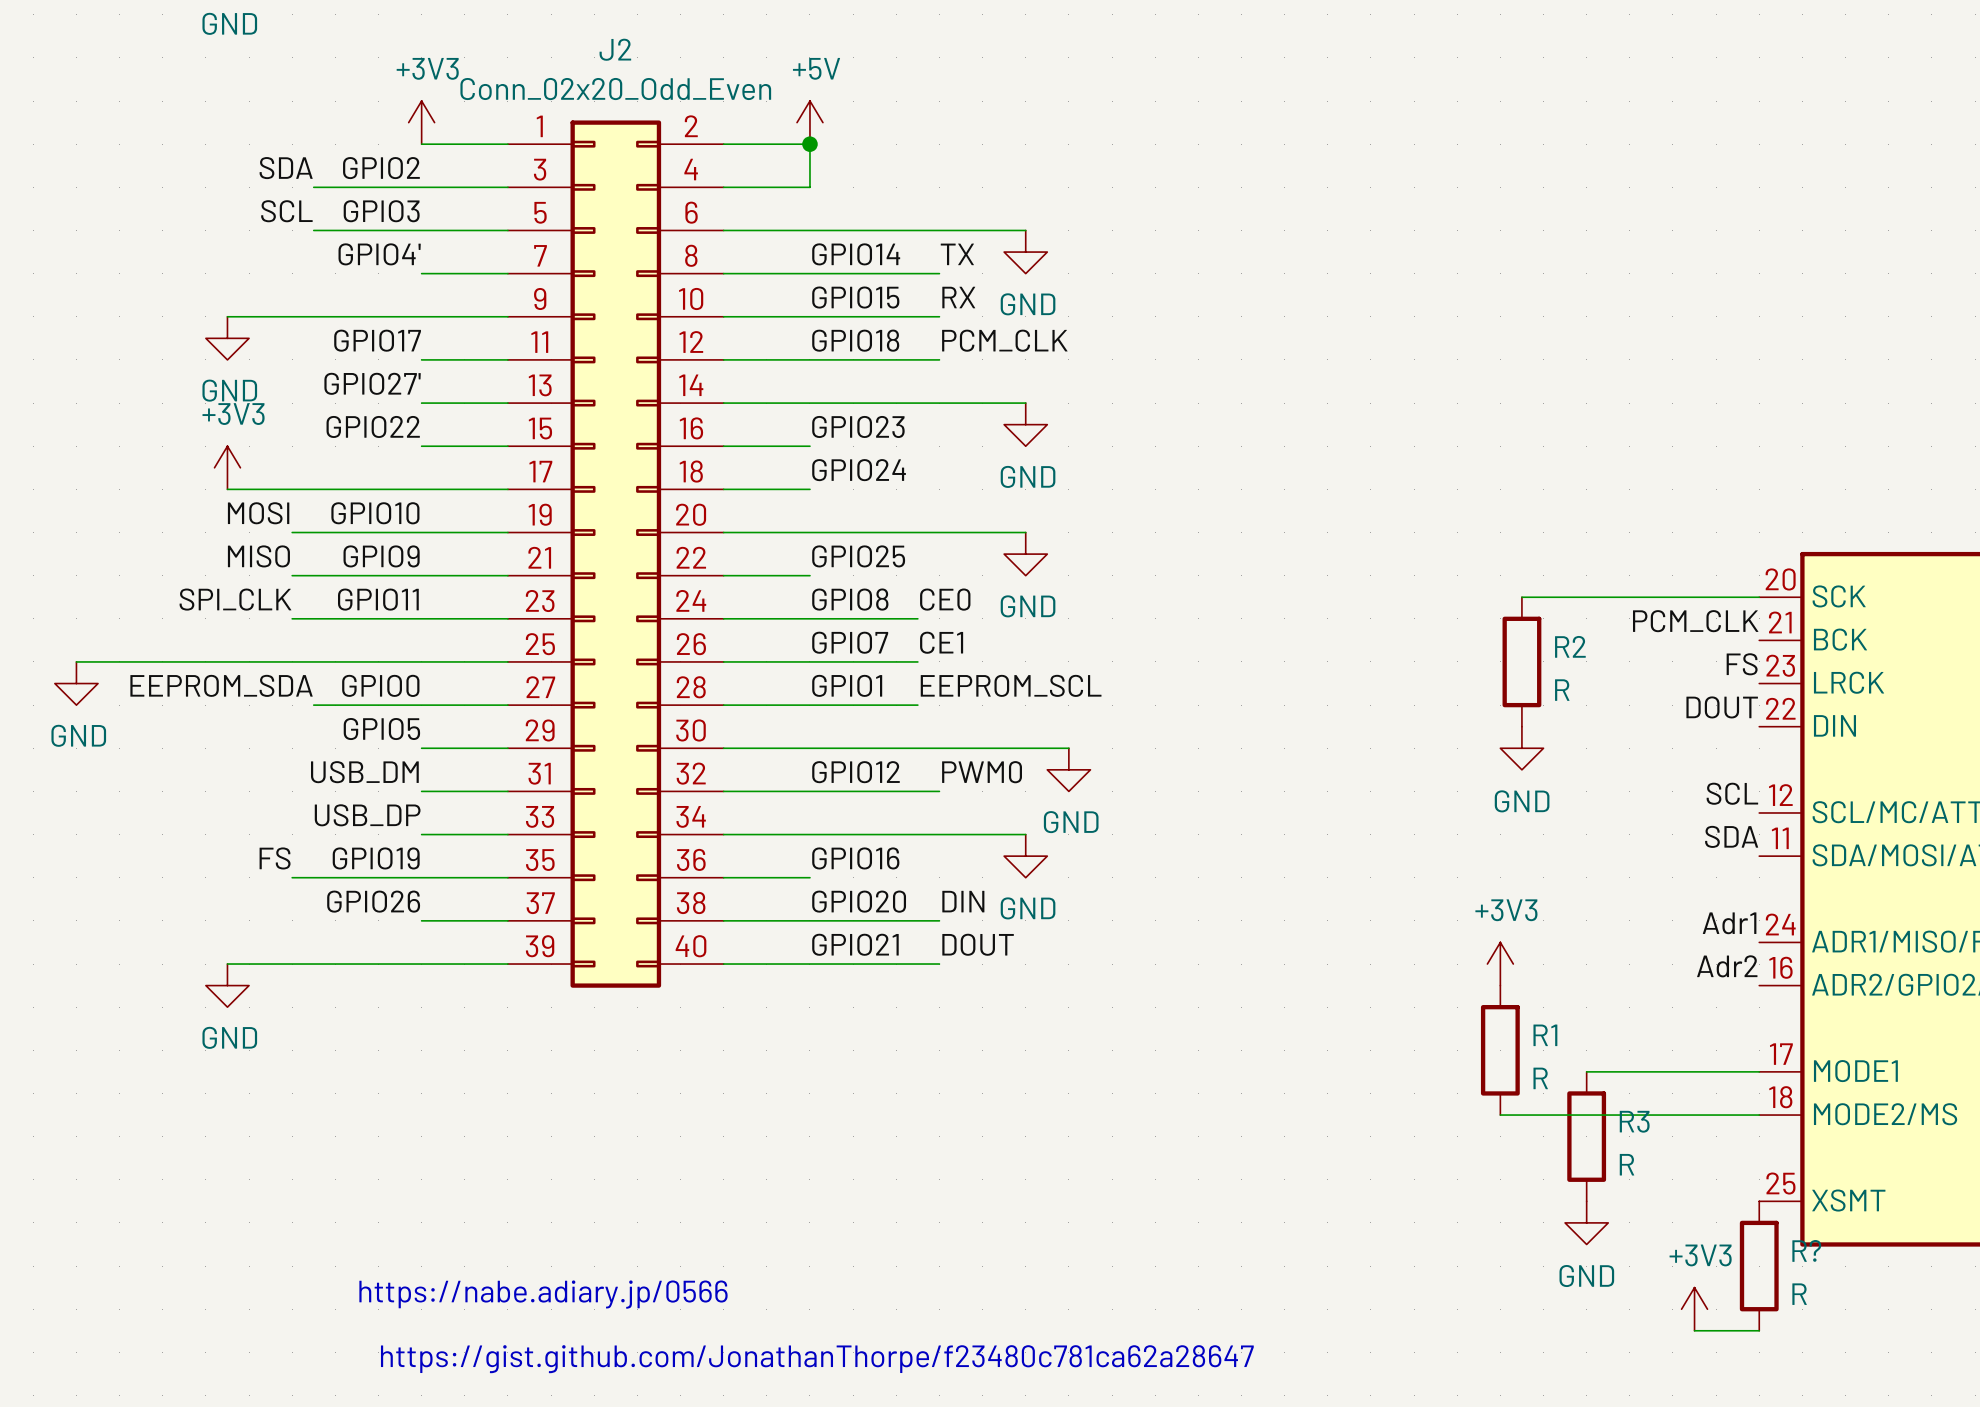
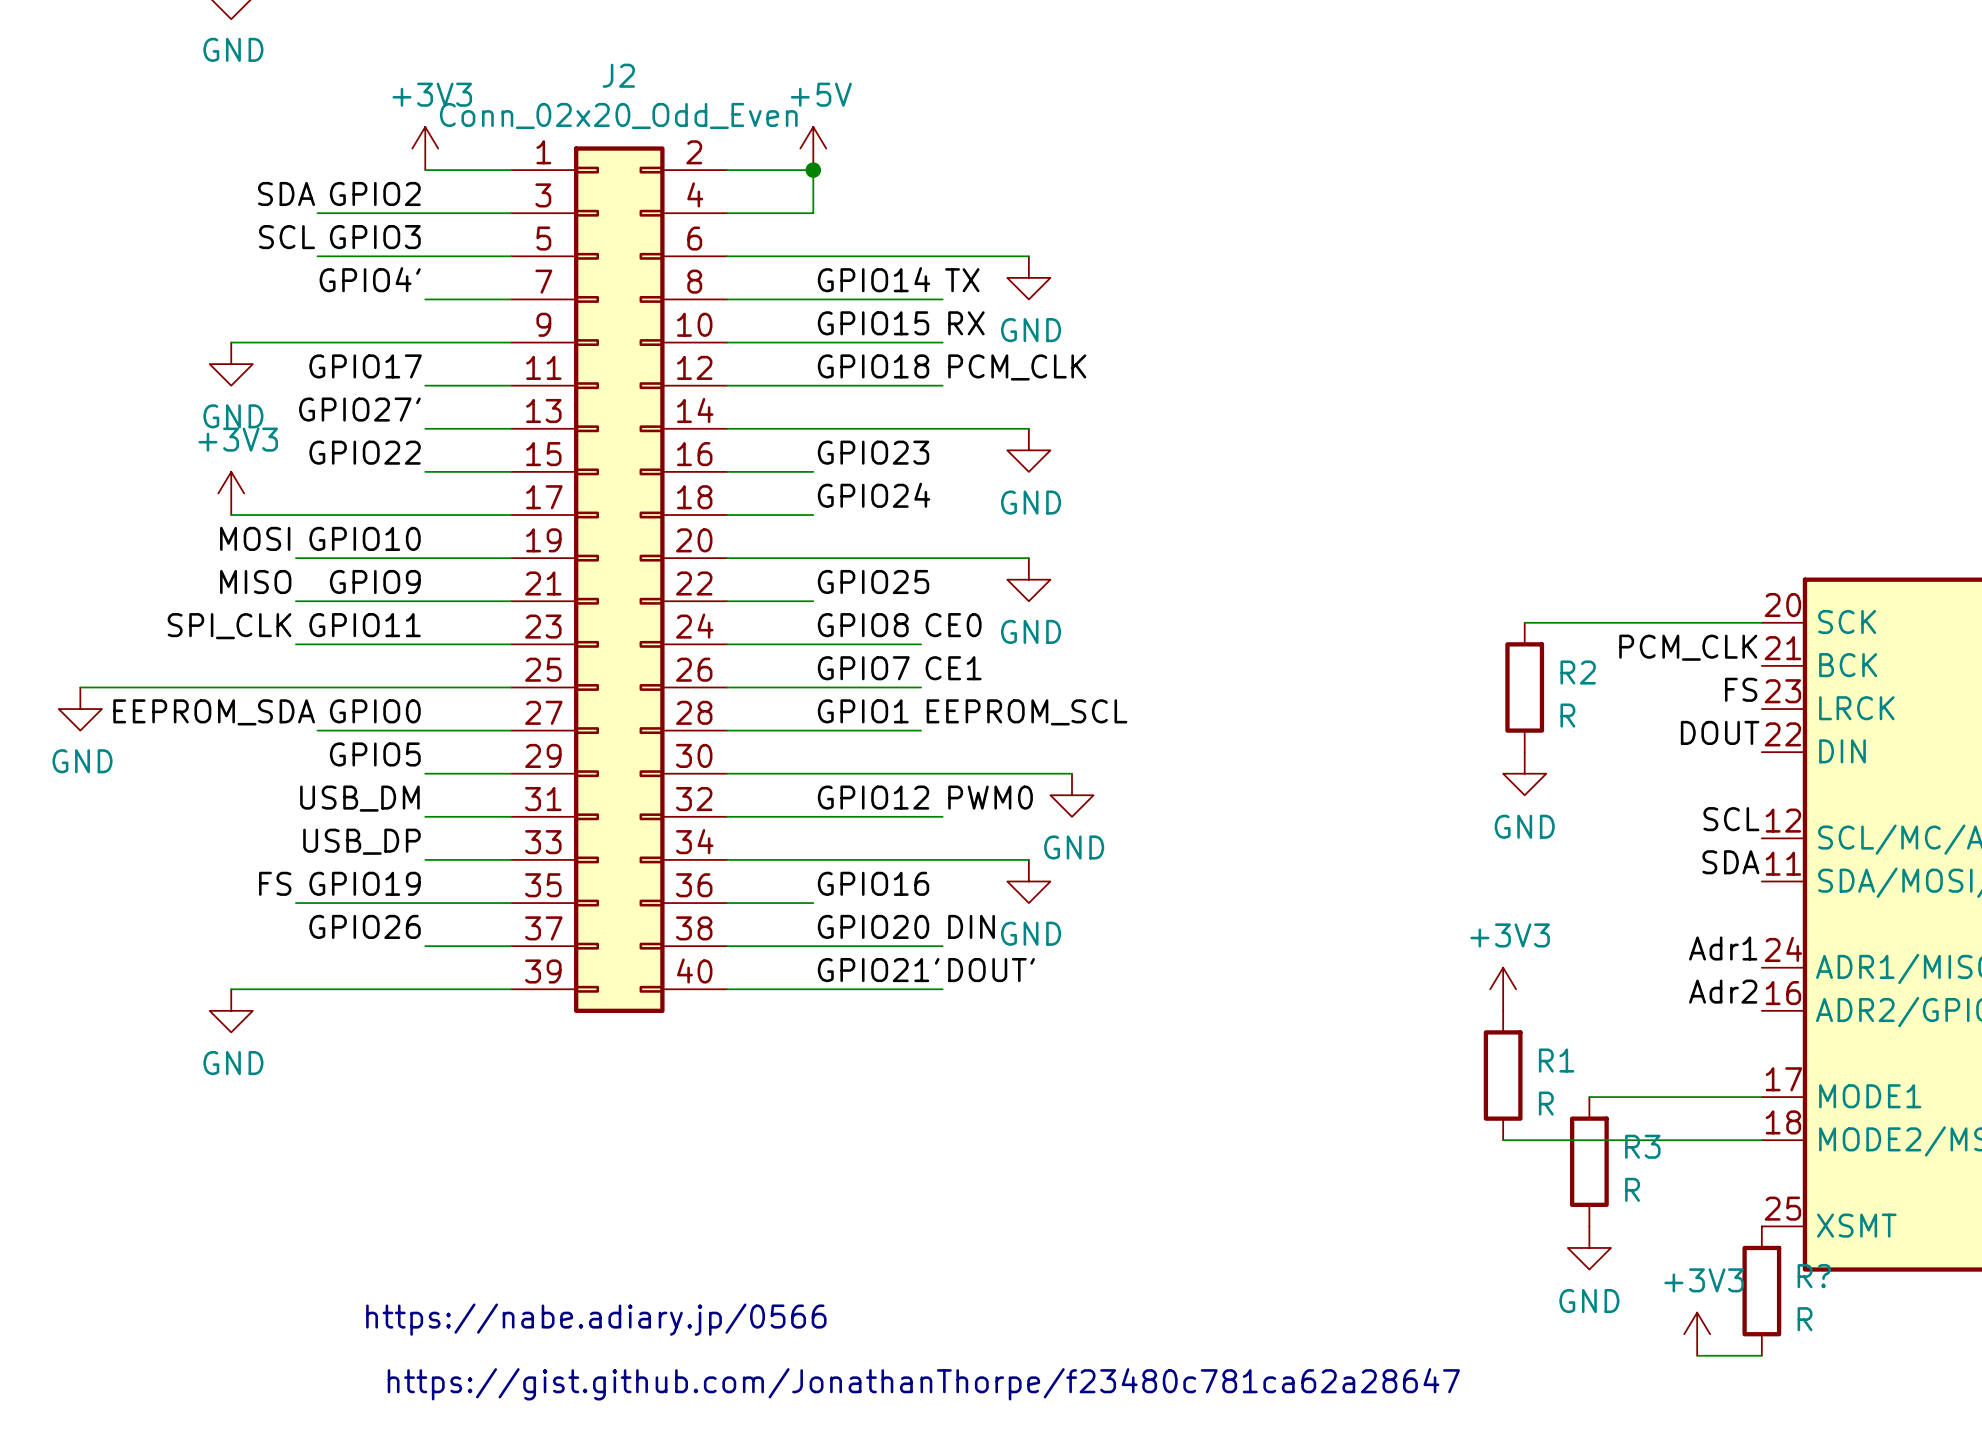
label: GPIO21 (855, 944) -> GPIO21' (878, 970)
label: DOUT (978, 944) -> DOUT' (991, 970)

